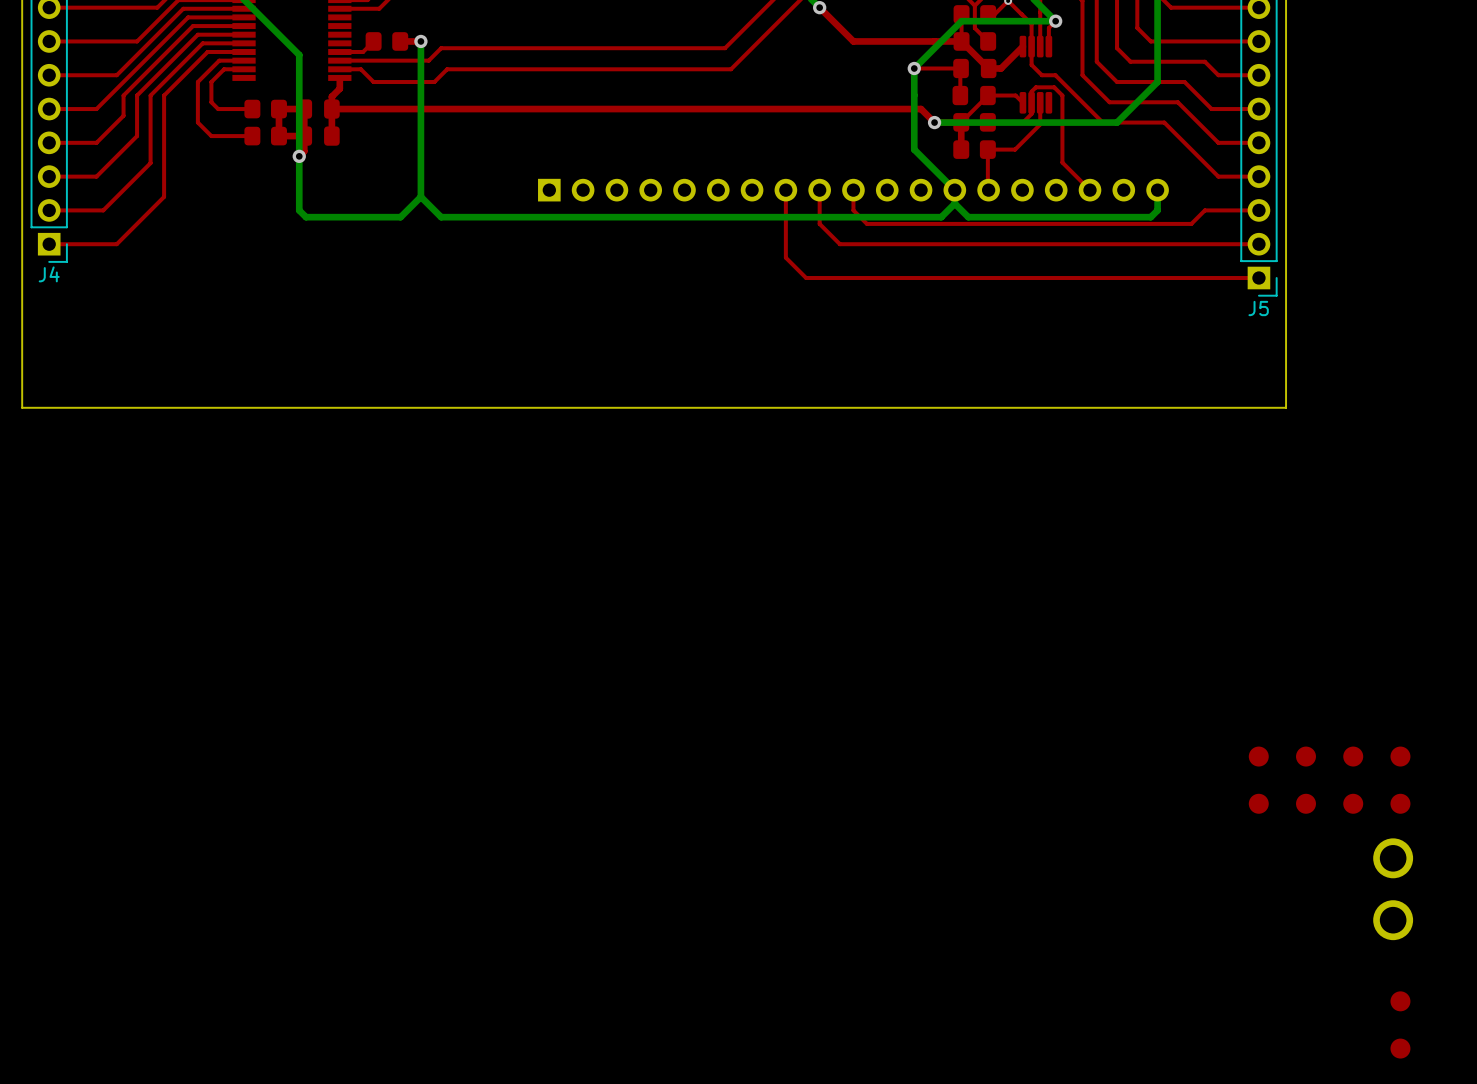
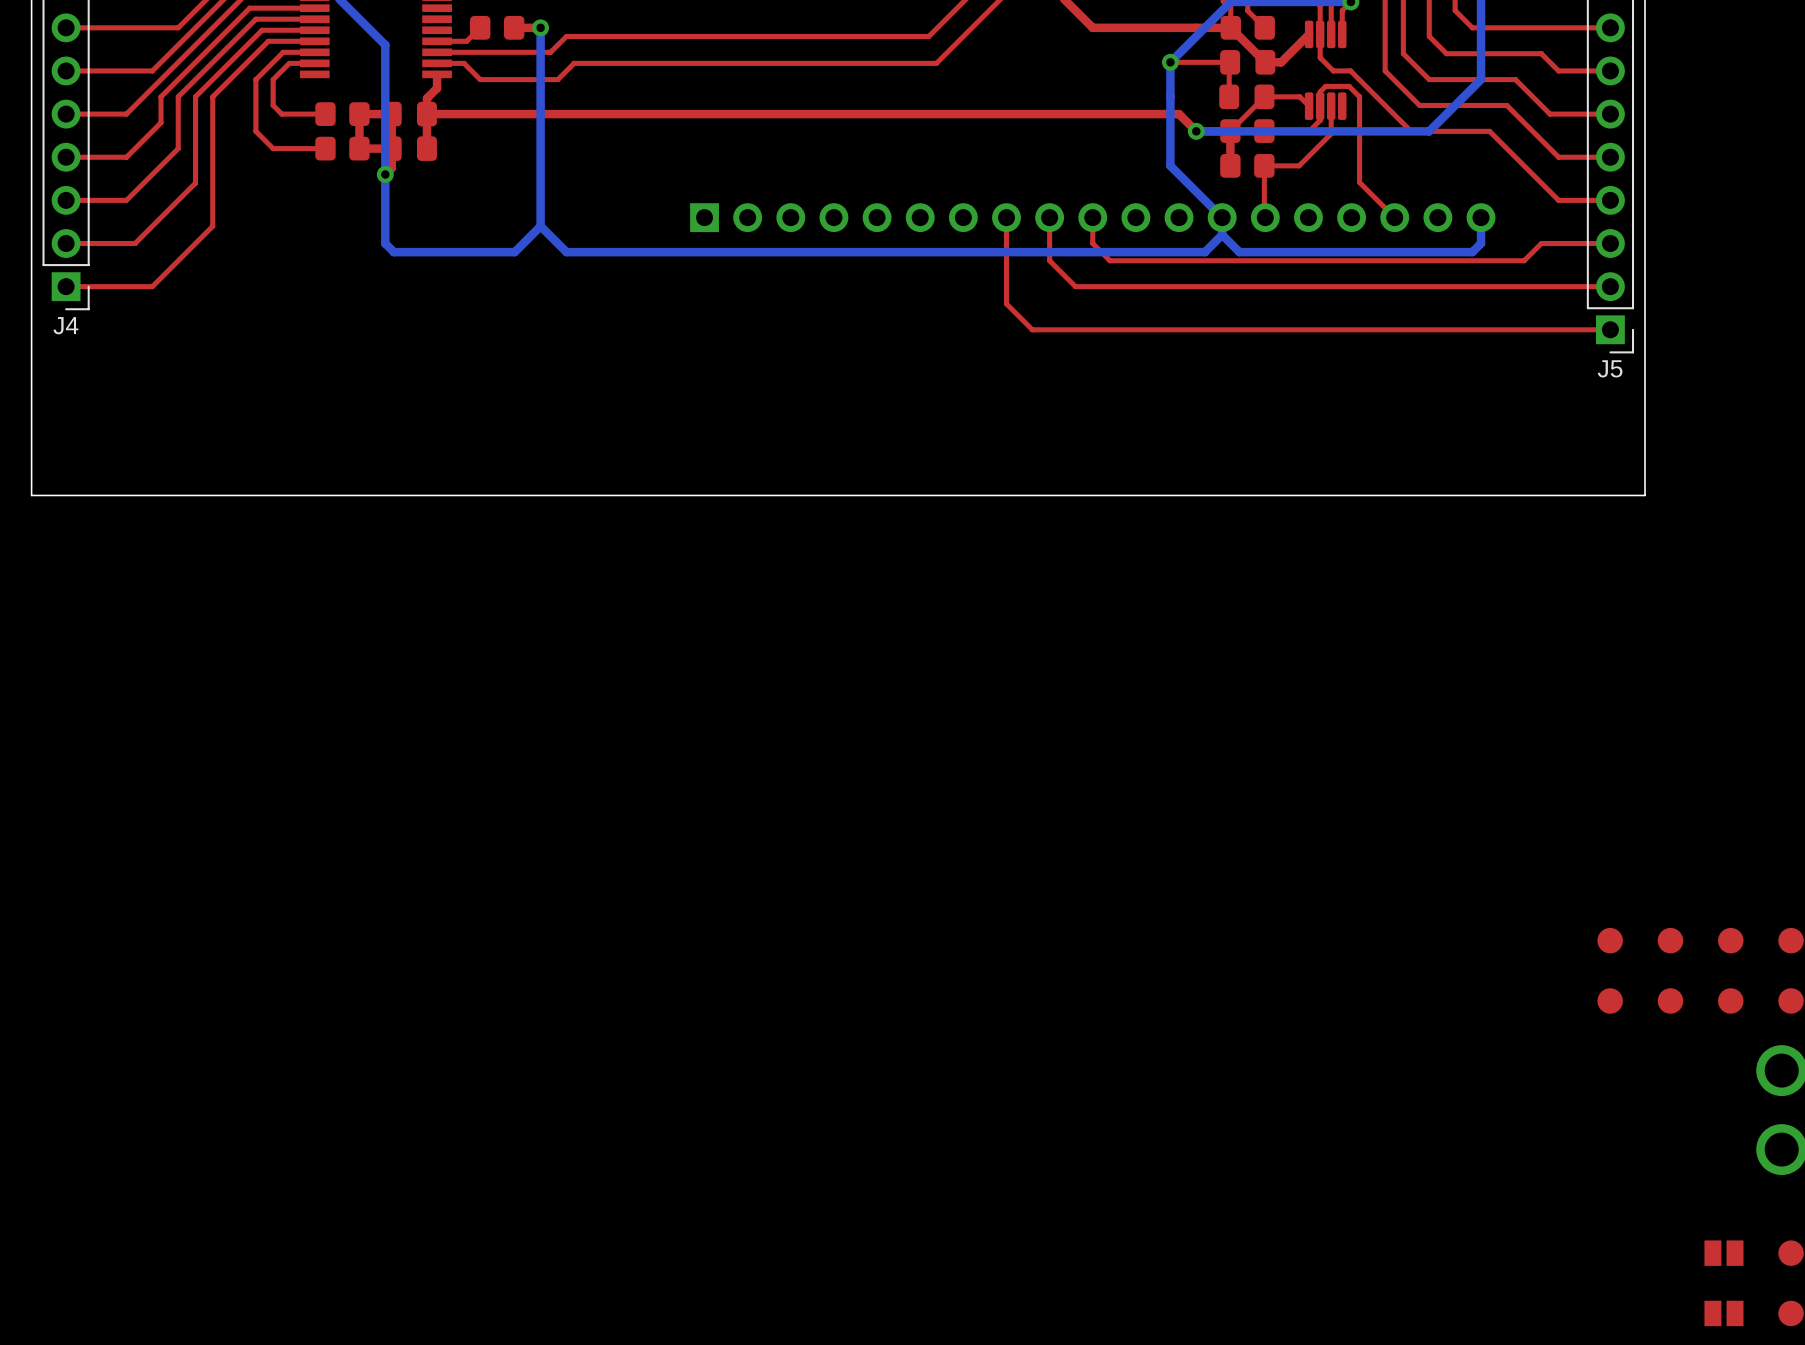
part: none -> (1723, 1253)
part: none -> (1723, 1313)

